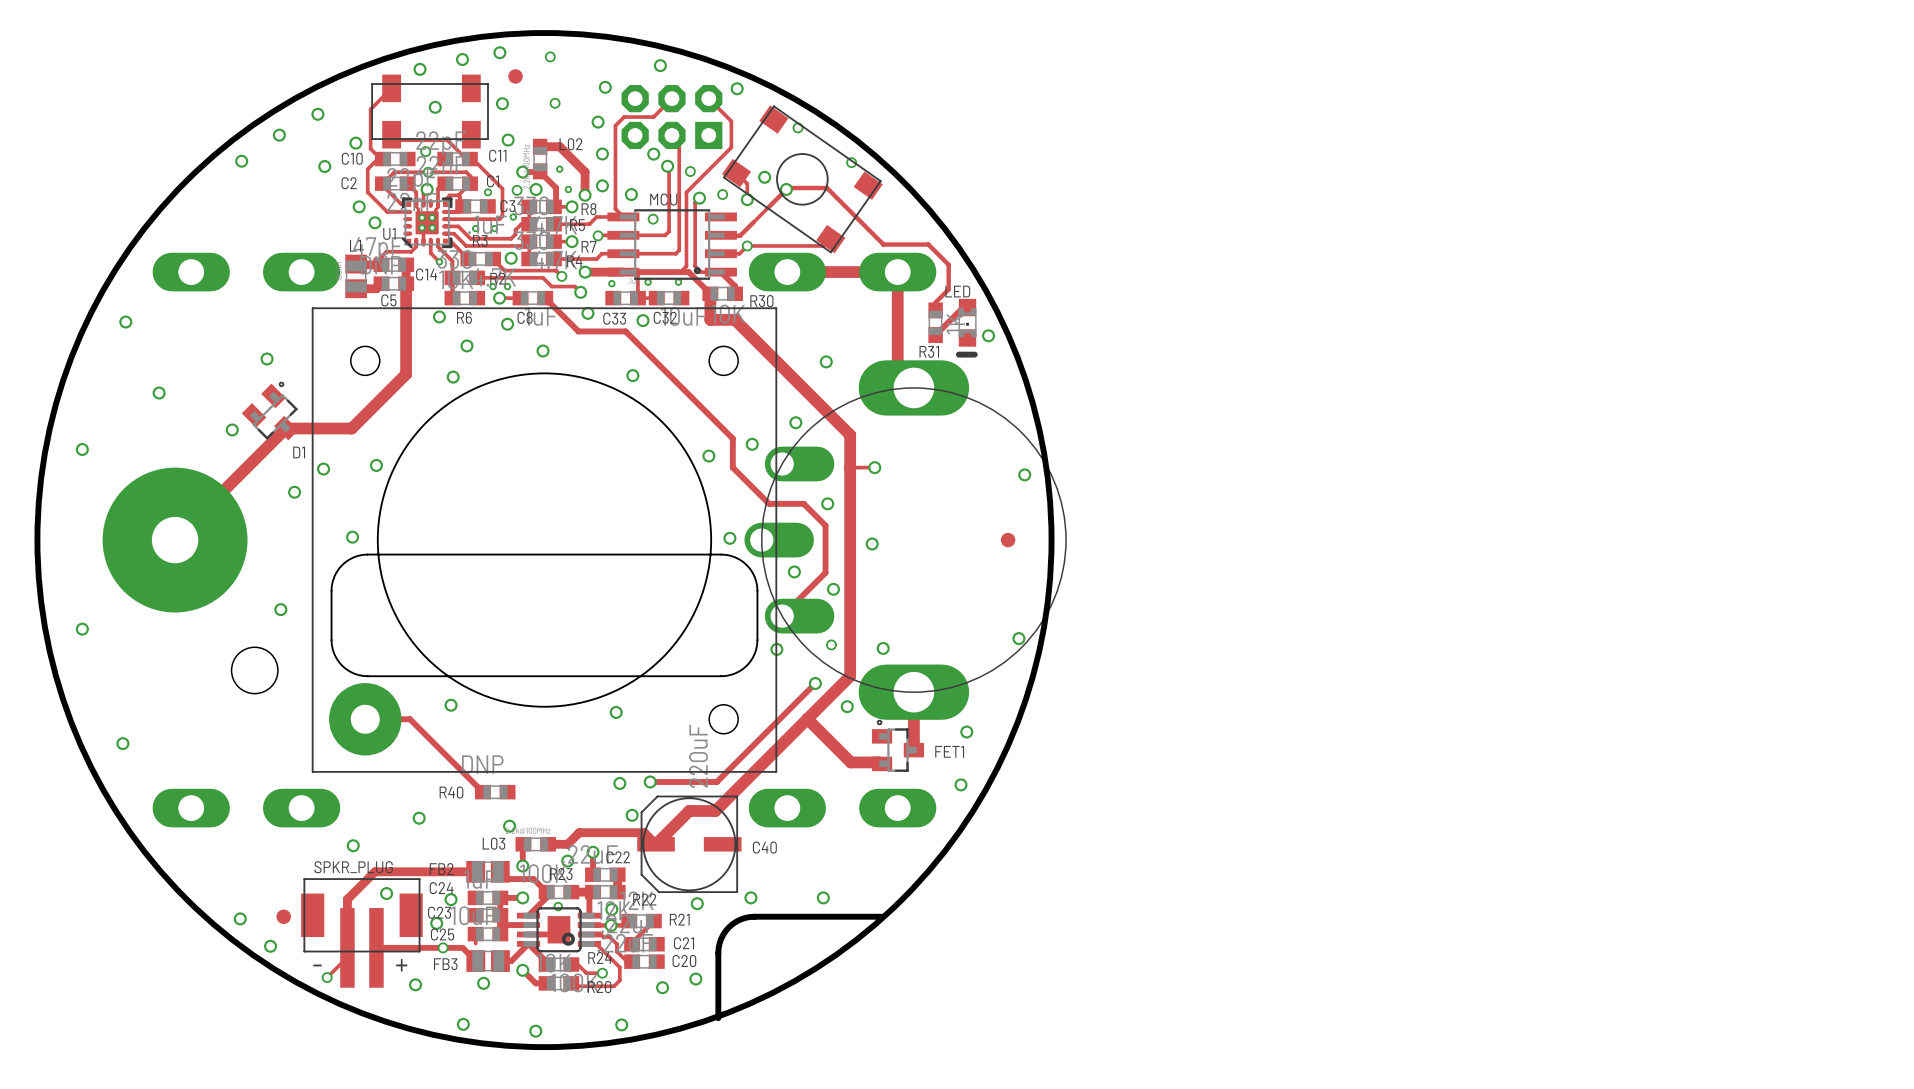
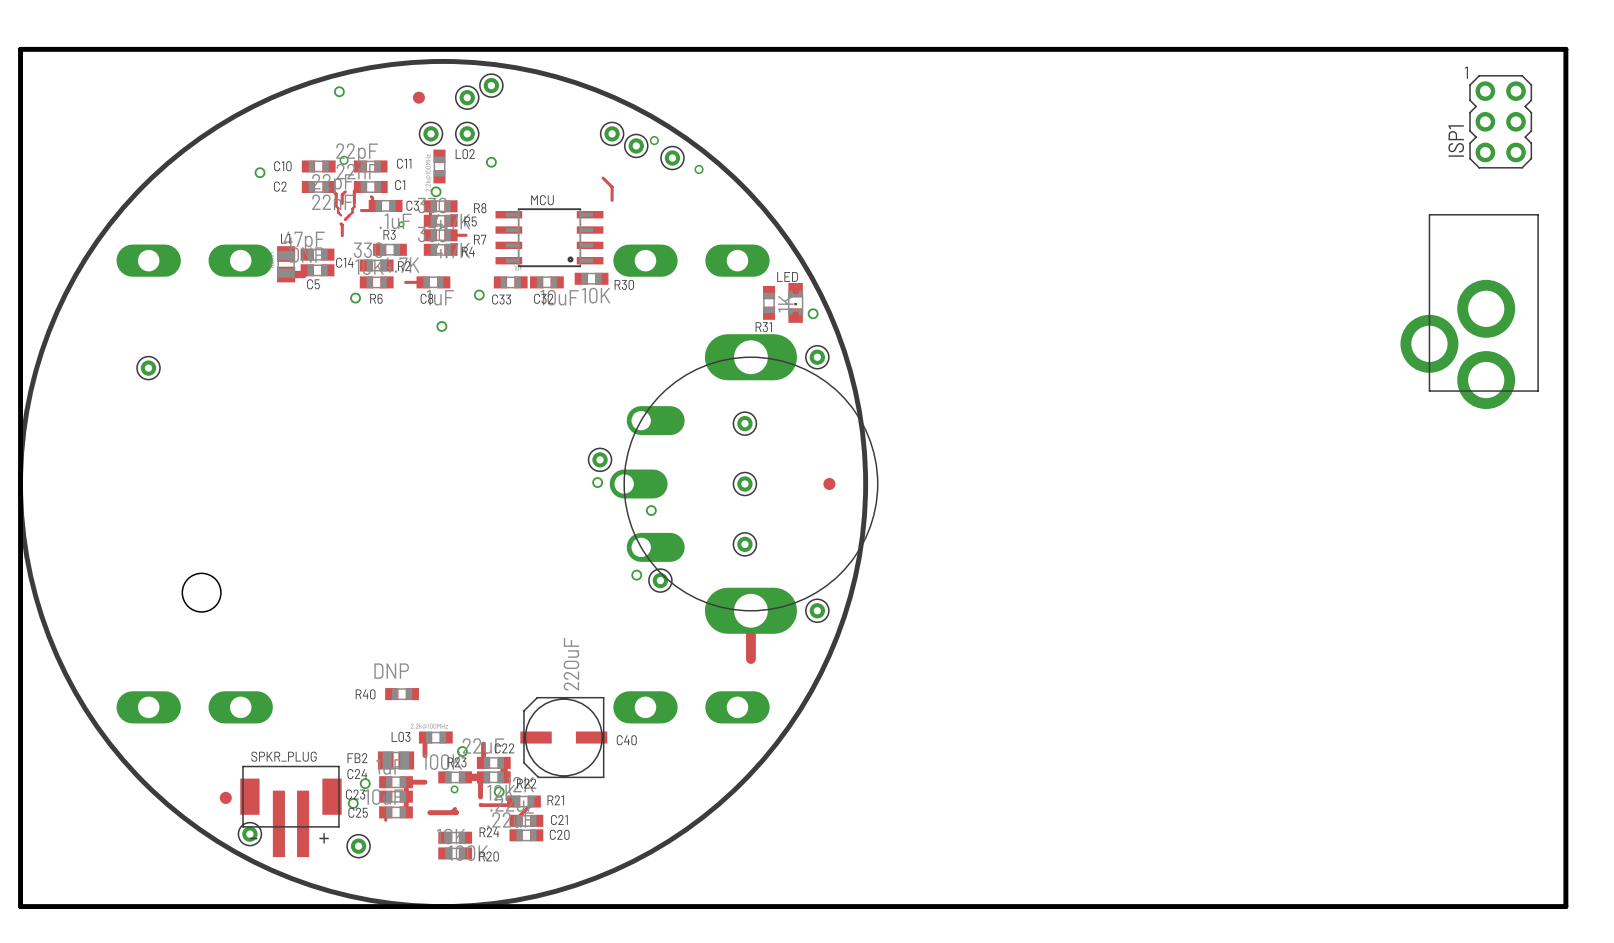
board edge: none -> (20, 49) (1565, 49) (1565, 906) (20, 906) (20, 49)
round board edge: [34, 30, 1055, 1051] -> none
drawing: none -> [18, 58, 869, 910]
via: (499, 52) -> none
via: (550, 56) -> none
via: (462, 59) -> none
part: none -> (491, 85)
via: (660, 65) -> none
part: none -> (467, 97)
via: (605, 87) -> none
track: (391, 88) (370, 109) (370, 148) (380, 159) -> none
via: (737, 88) -> none
track: (671, 98) (653, 117) (624, 117) (615, 125) (615, 209) (623, 216) -> none
track: (708, 98) (731, 121) (731, 147) (686, 192) (686, 266) (680, 272) (637, 272) (637, 298) (656, 298) -> none
via: (502, 103) -> none
via: (555, 103) -> none
ISP1: none -> (1500, 121)
via: (435, 107) -> none
part: (430, 111) -> none
via: (317, 114) -> none
part: (671, 117) -> none
part: none -> (431, 133)
part: none -> (467, 133)
part: none -> (612, 133)
via: (598, 122) -> none
track: (391, 134) (395, 140) (447, 140) (466, 159) (472, 159) (502, 188) (502, 216) (499, 219) (446, 219) -> none
part: none -> (636, 145)
via: (279, 135) -> none
track: (671, 135) (679, 142) (679, 250) (675, 253) (601, 253) (596, 259) (553, 259) -> none
via: (508, 140) -> none
via: (355, 143) -> none
track: (540, 146) (559, 146) (585, 172) (585, 195) -> none
part: none -> (672, 158)
via: (653, 154) -> none
track: (382, 160) (382, 159) (377, 159) (367, 169) (367, 192) (387, 211) (407, 211) -> none
via: (241, 161) -> none
track: (667, 166) (669, 231) (665, 235) (598, 235) -> none
via: (667, 166) -> none
via: (559, 169) -> none
via: (690, 171) -> none
via: (428, 172) -> none
track: (522, 172) (540, 171) (556, 188) (556, 206) (553, 206) (572, 206) -> none
via: (522, 172) -> none
via: (764, 177) -> none
part: (802, 179) -> none
via: (602, 185) -> none
via: (427, 189) -> none
via: (568, 189) -> none
via: (786, 189) -> none
via: (517, 190) -> none
via: (487, 192) -> none
via: (631, 194) -> none
via: (722, 194) -> none
via: (585, 195) -> none
track: (699, 198) (695, 202) (695, 266) (701, 272) (720, 272) (734, 286) (734, 293) -> none
via: (699, 198) -> none
via: (747, 199) -> none
track: (403, 204) (408, 204) (401, 203) (382, 185) (394, 172) (466, 172) (470, 176) (470, 183) (458, 195) (449, 195) (445, 199) (445, 204) -> none
via: (359, 206) -> none
via: (572, 206) -> none
via: (422, 217) -> none
via: (432, 217) -> none
via: (513, 217) -> none
track: (623, 217) (596, 217) (589, 224) (553, 224) -> none
via: (653, 219) -> none
track: (527, 221) (529, 224) (521, 224) (511, 238) (470, 238) (458, 226) (446, 226) -> none
via: (374, 222) -> none
U1: (427, 222) -> none
via: (422, 227) -> none
via: (432, 227) -> none
via: (475, 228) -> none
track: (723, 232) (721, 235) (740, 235) (787, 188) (826, 188) (883, 244) (928, 244) (948, 264) (948, 289) (935, 302) (935, 310) -> none
track: (446, 233) (453, 233) (466, 245) (524, 245) (529, 241) (529, 259) -> none
via: (598, 235) -> none
track: (830, 239) (823, 245) (747, 245) (739, 253) (720, 253) -> none
track: (445, 241) (450, 241) (468, 259) -> none
via: (572, 241) -> none
track: (416, 242) (416, 246) (411, 251) (386, 251) (382, 256) (381, 264) (356, 264) -> none
track: (430, 242) (430, 253) (439, 261) -> none
track: (438, 242) (438, 246) (452, 261) (452, 298) -> none
via: (747, 245) -> none
via: (511, 258) -> none
track: (493, 259) (504, 270) (556, 270) (561, 276) -> none
via: (439, 261) -> none
track: (406, 264) (406, 374) (351, 428) (286, 428) (175, 540) -> none
track: (585, 272) (688, 272) (710, 293) (710, 319) (734, 319) (850, 435) (850, 676) (715, 810) (689, 810) (656, 844) (644, 832) (579, 832) (567, 844) (548, 844) -> none
via: (585, 272) -> none
track: (787, 272) (897, 272) (897, 371) (913, 387) -> none
via: (561, 276) -> none
track: (477, 277) (543, 277) (551, 286) (574, 286) (580, 292) -> none
via: (648, 282) -> none
via: (678, 282) -> none
via: (611, 283) -> none
via: (493, 286) -> none
via: (507, 286) -> none
via: (580, 292) -> none
via: (499, 298) -> none
track: (545, 298) (578, 331) (625, 331) (732, 438) (732, 467) (769, 503) (803, 503) (825, 525) (825, 572) (782, 616) -> none
track: (967, 307) (963, 307) (935, 335) -> none
via: (643, 320) -> none
via: (125, 322) -> none
via: (507, 324) -> none
part: none -> (1469, 311)
via: (466, 345) -> none
line: (958, 354) (974, 354) -> none
via: (267, 358) -> none
via: (826, 361) -> none
via: (632, 375) -> none
via: (453, 377) -> none
part: none -> (817, 357)
via: (159, 393) -> none
part: none -> (148, 368)
D1: (270, 411) -> none
via: (795, 422) -> none
via: (232, 429) -> none
via: (752, 444) -> none
via: (82, 449) -> none
via: (708, 456) -> none
via: (376, 465) -> none
track: (850, 467) (874, 467) -> none
via: (874, 467) -> none
part: none -> (744, 423)
via: (323, 469) -> none
via: (1024, 474) -> none
via: (294, 492) -> none
via: (827, 503) -> none
part: none -> (600, 459)
via: (352, 537) -> none
part: (175, 540) -> none
part: (544, 540) -> none
part: none -> (744, 484)
via: (872, 543) -> none
via: (833, 589) -> none
via: (280, 609) -> none
part: none -> (744, 544)
via: (82, 629) -> none
via: (1018, 638) -> none
via: (831, 644) -> none
via: (883, 648) -> none
part: none -> (660, 580)
track: (815, 683) (716, 782) (650, 782) -> none
via: (815, 683) -> none
part: none -> (817, 610)
via: (451, 705) -> none
via: (847, 706) -> none
via: (616, 712) -> none
track: (807, 718) (850, 762) (882, 763) -> none
track: (365, 719) (410, 719) (482, 792) -> none
via: (966, 732) -> none
via: (122, 743) -> none
FET1: (897, 745) -> none
via: (650, 782) -> none
via: (619, 783) -> none
via: (960, 784) -> none
via: (632, 815) -> none
via: (419, 818) -> none
via: (509, 826) -> none
via: (353, 845) -> none
via: (593, 852) -> none
via: (522, 866) -> none
track: (475, 871) (374, 871) (347, 899) (347, 957) (327, 977) -> none
track: (500, 871) (506, 879) (533, 879) (546, 892) (546, 897) (528, 915) -> none
via: (386, 893) -> none
via: (522, 897) -> none
via: (750, 897) -> none
via: (823, 897) -> none
via: (697, 903) -> none
board edge: (882, 916) (754, 916) (736, 921) (723, 934) (718, 948) (718, 1018) -> none
via: (240, 918) -> none
track: (500, 925) (528, 925) -> none
via: (611, 925) -> none
part: (558, 929) -> none
track: (590, 935) (589, 934) (600, 934) (603, 937) (609, 937) (616, 944) (616, 951) (627, 961) (632, 961) -> none
track: (589, 943) (596, 944) (619, 967) (619, 980) (614, 986) (574, 986) (571, 983) -> none
via: (270, 946) -> none
track: (376, 947) (462, 947) (475, 961) -> none
via: (443, 947) -> none
part: none -> (249, 834)
FB3: (488, 961) -> none
track: (500, 961) (511, 961) (528, 943) (546, 962) (546, 964) -> none
track: (571, 964) (577, 964) (586, 973) (602, 973) -> none
track: (522, 970) (535, 983) (546, 983) -> none
via: (522, 970) -> none
via: (602, 973) -> none
part: none -> (358, 846)
via: (327, 977) -> none
via: (695, 979) -> none
via: (483, 983) -> none
via: (415, 984) -> none
via: (662, 987) -> none
via: (463, 1024) -> none
via: (621, 1024) -> none
via: (535, 1031) -> none

